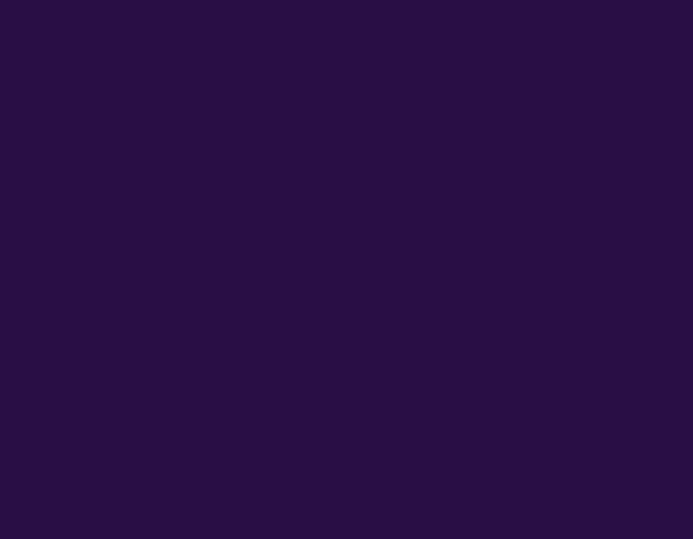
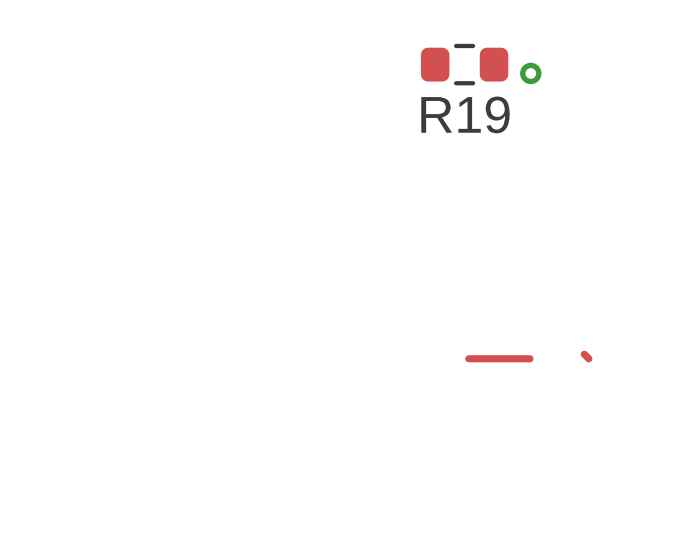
R19: none -> (464, 64)
via: none -> (530, 73)
track: none -> (584, 354) (588, 358)
track: none -> (468, 358) (530, 358)

